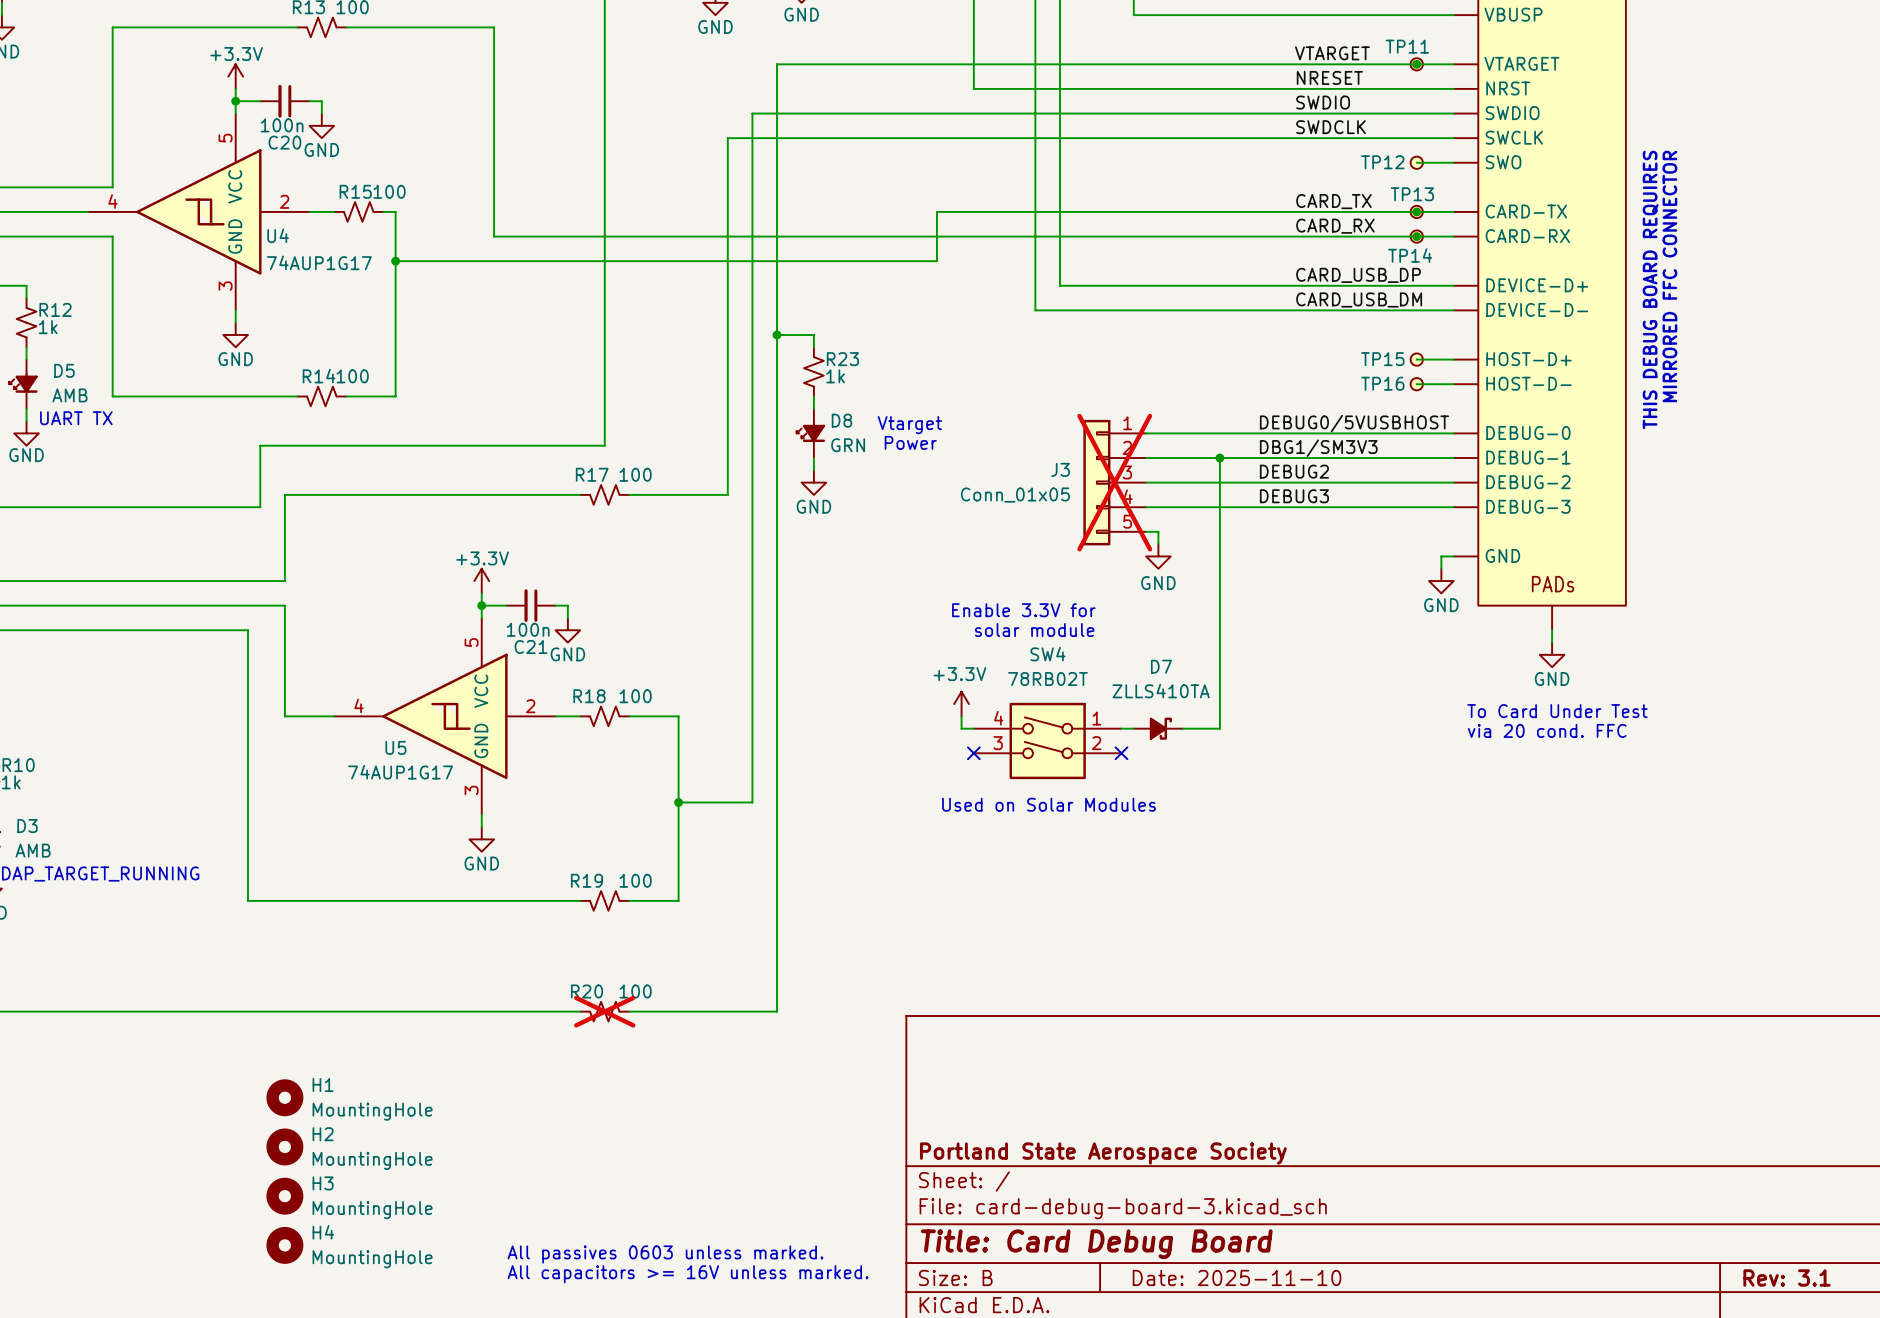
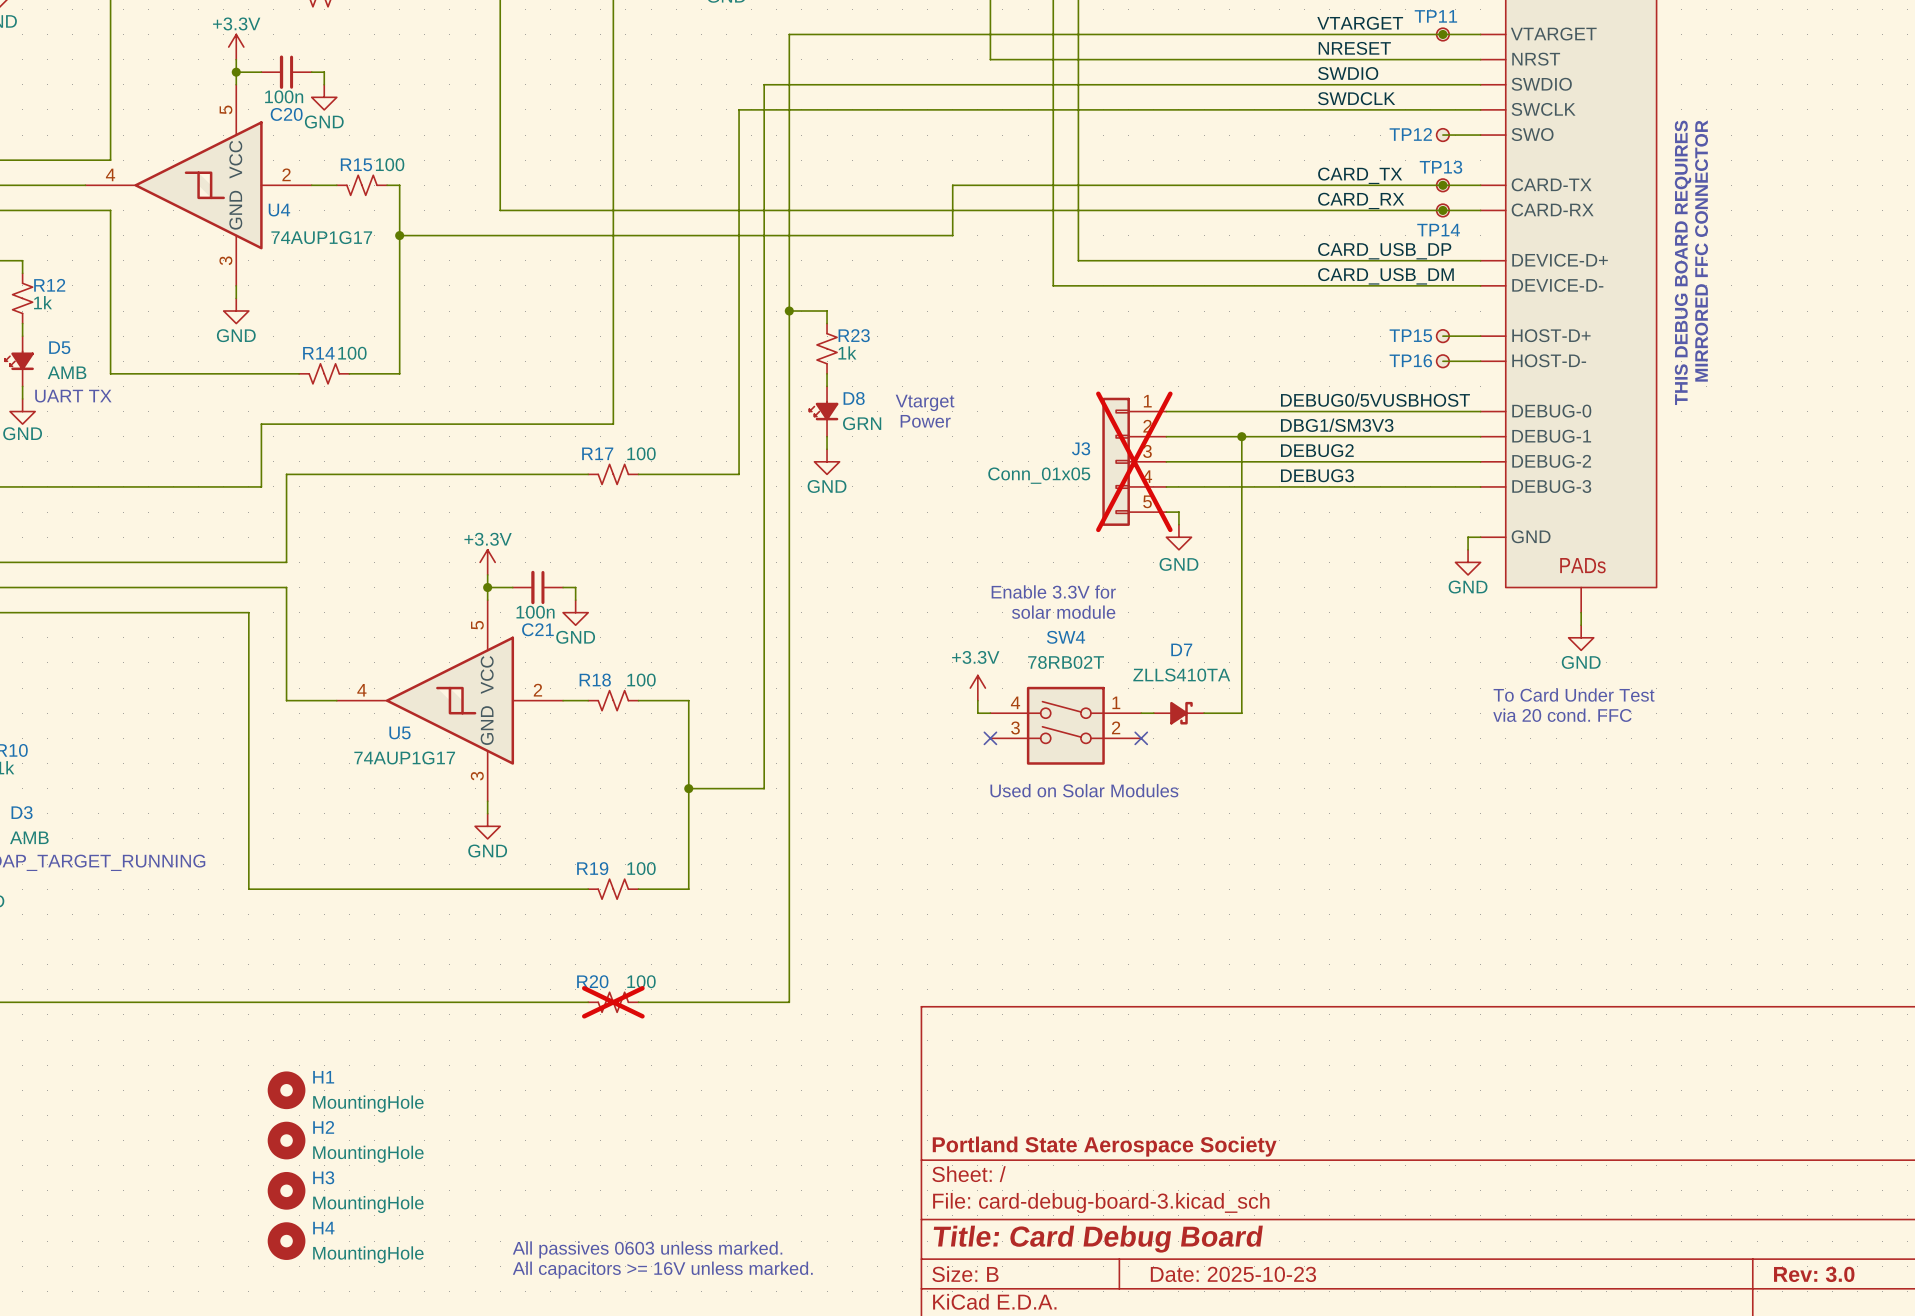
title block: Date: 2025-11-10 (1237, 1277) -> Date: 2025-10-23 (1233, 1274)
title block: Rev: 3.1 (1787, 1277) -> Rev: 3.0 (1814, 1274)

